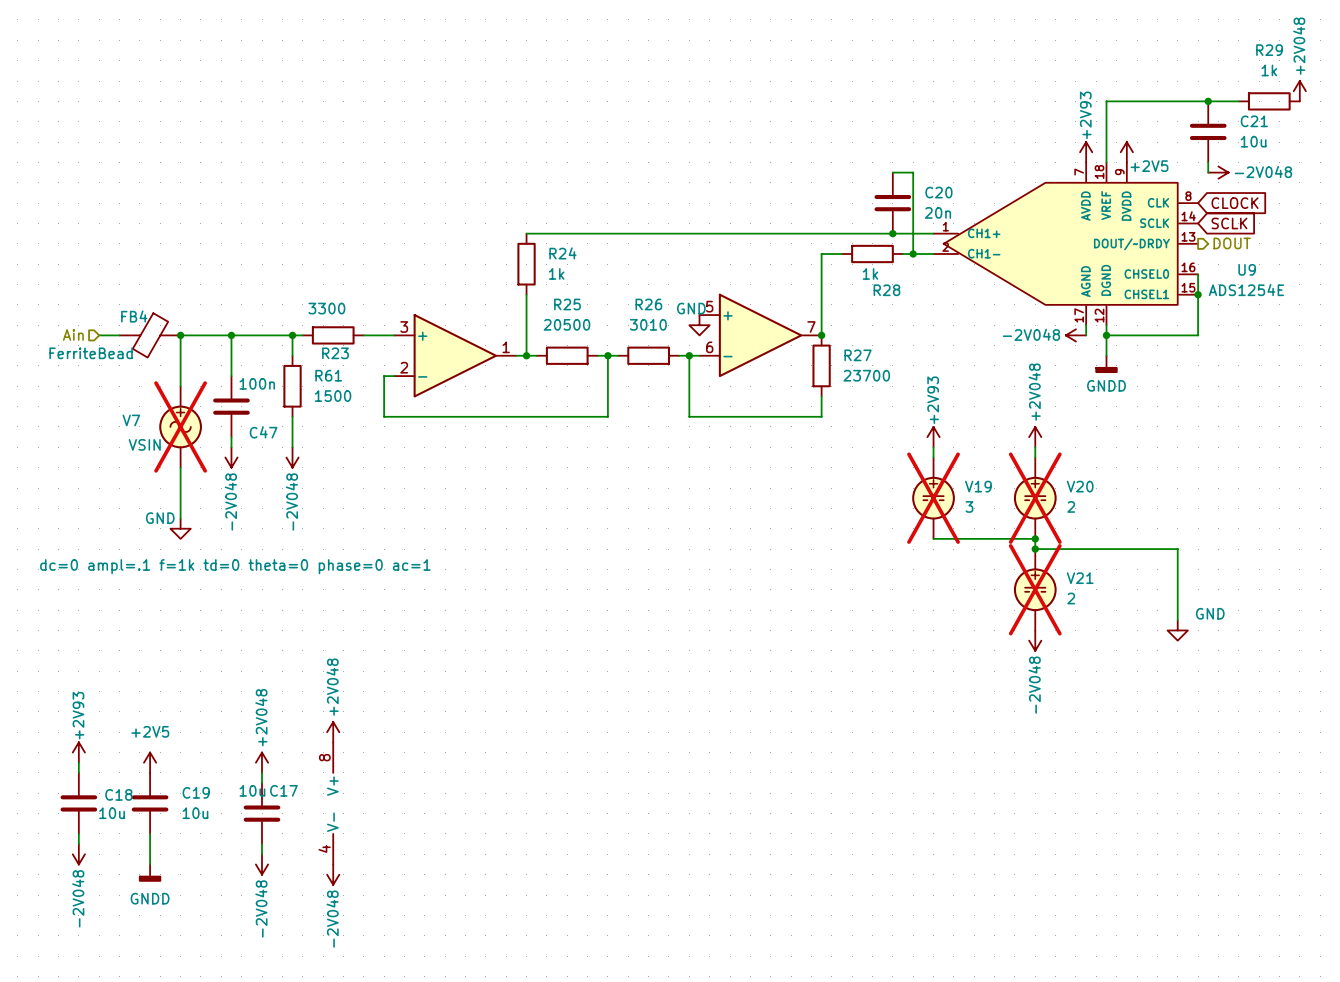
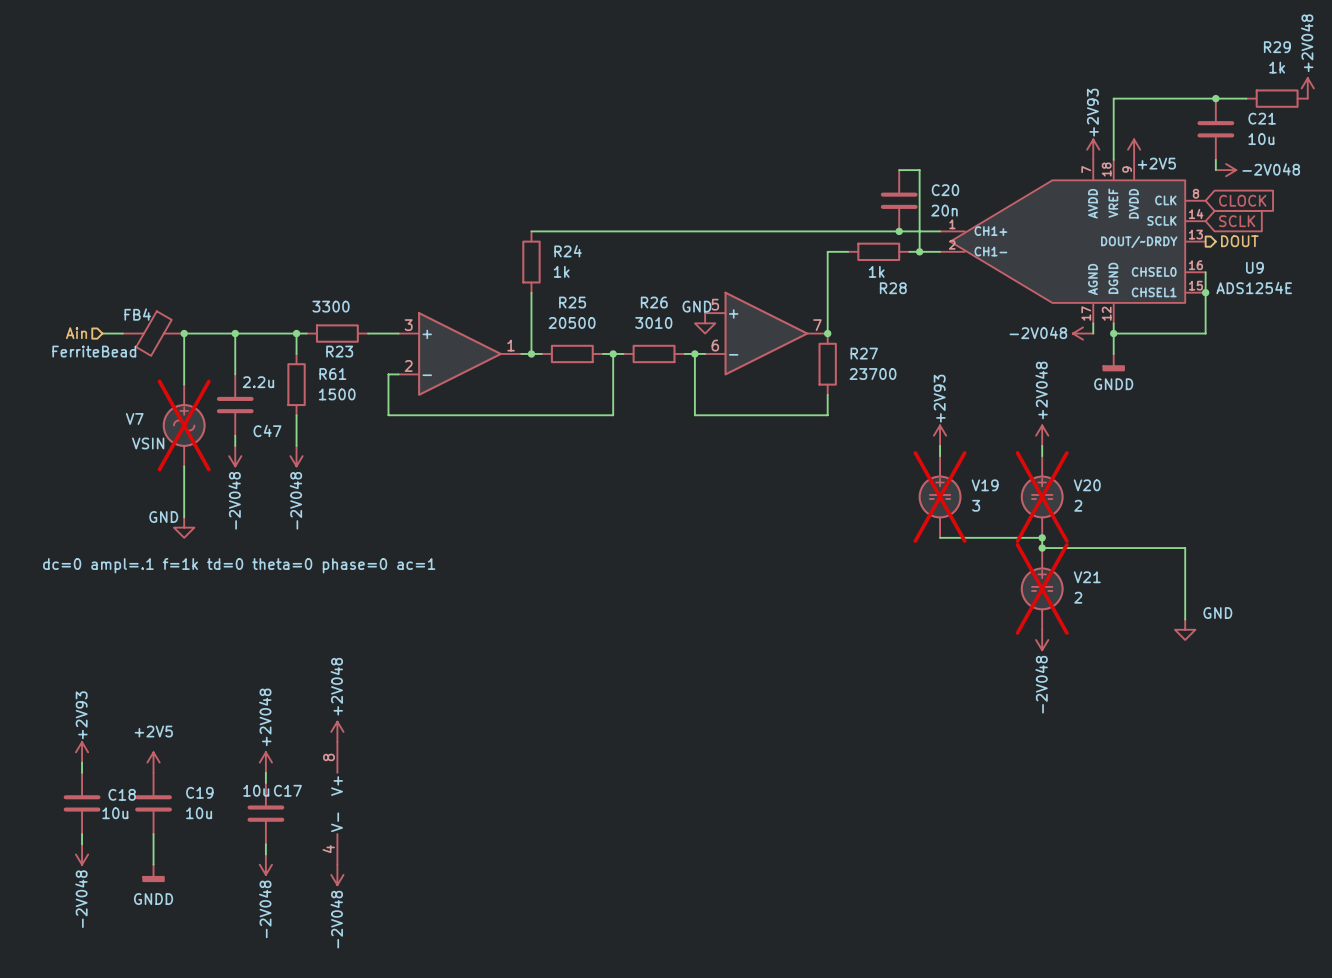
C47 value: 100n (257, 383) -> 2.2u (258, 382)

